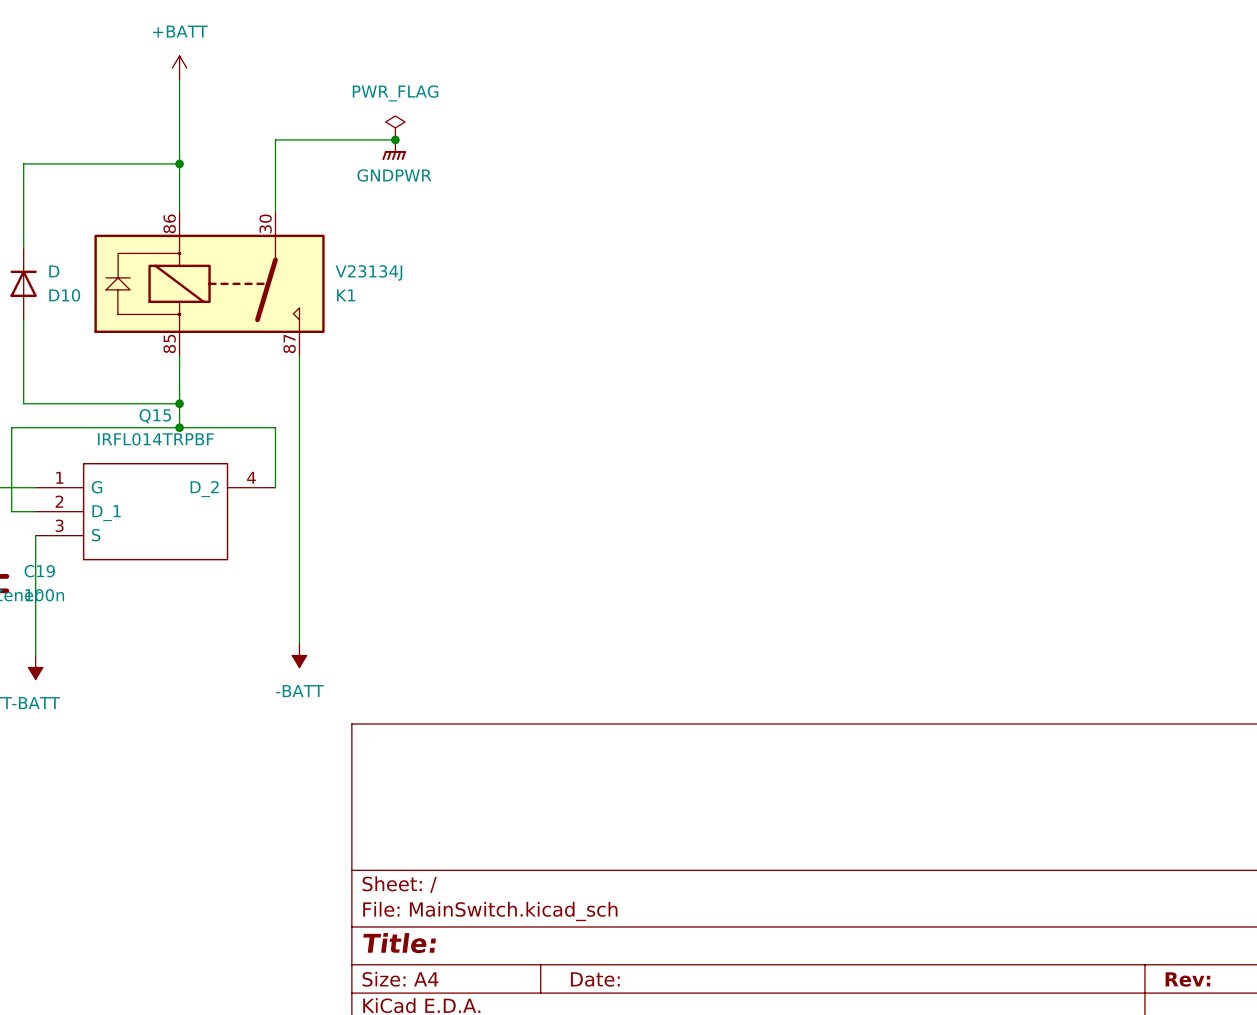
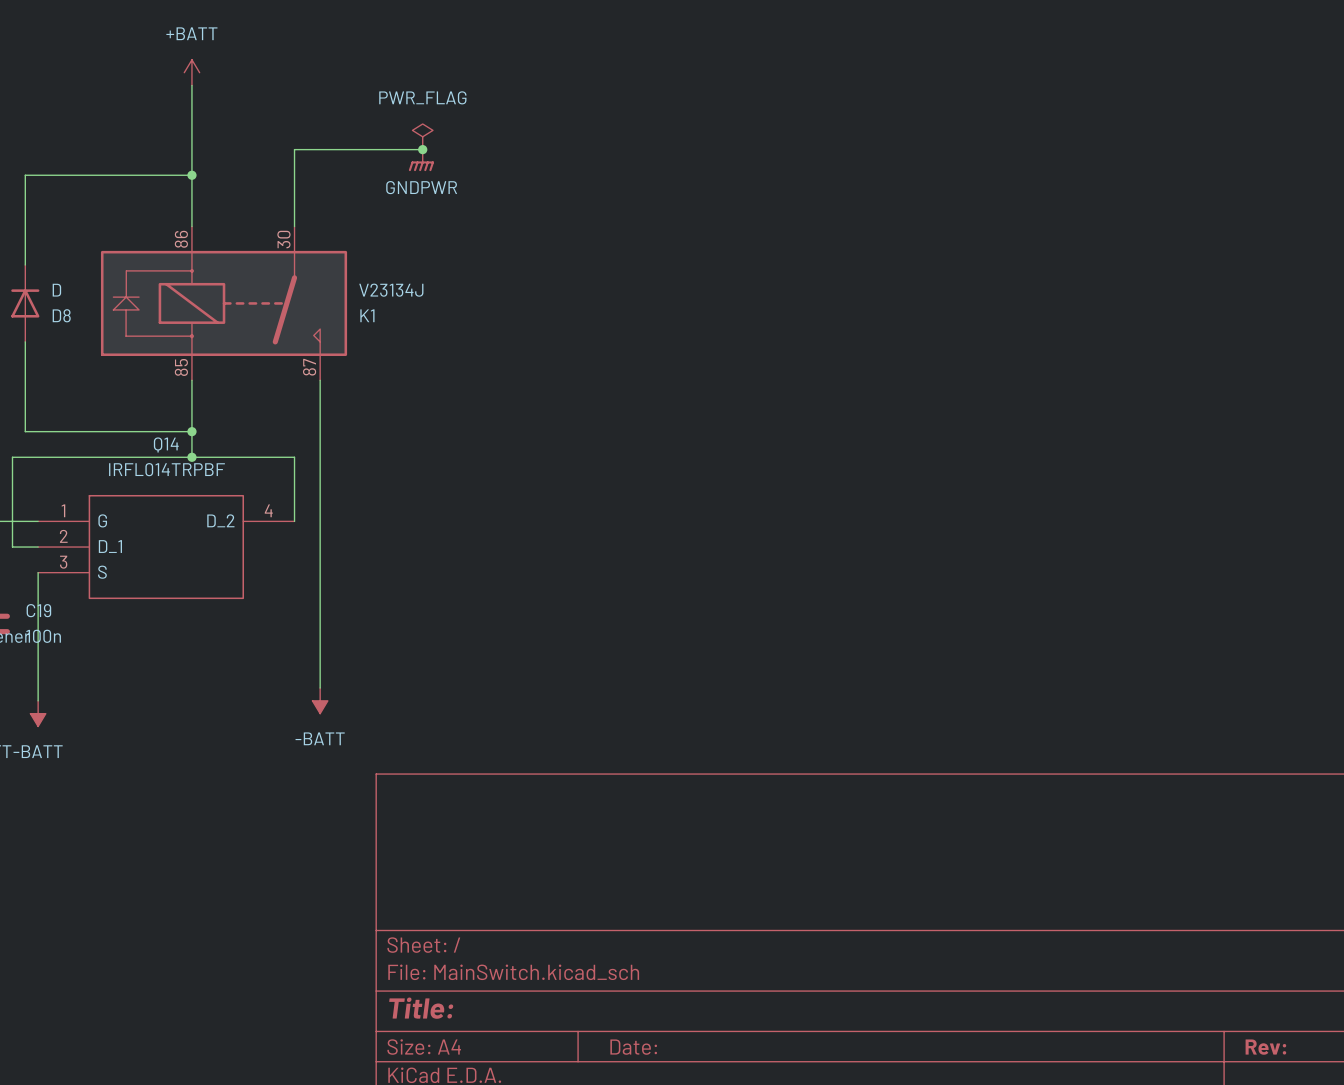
D10 name: D10 (64, 295) -> D8 (61, 315)
Q15 name: Q15 (155, 416) -> Q14 (166, 444)

